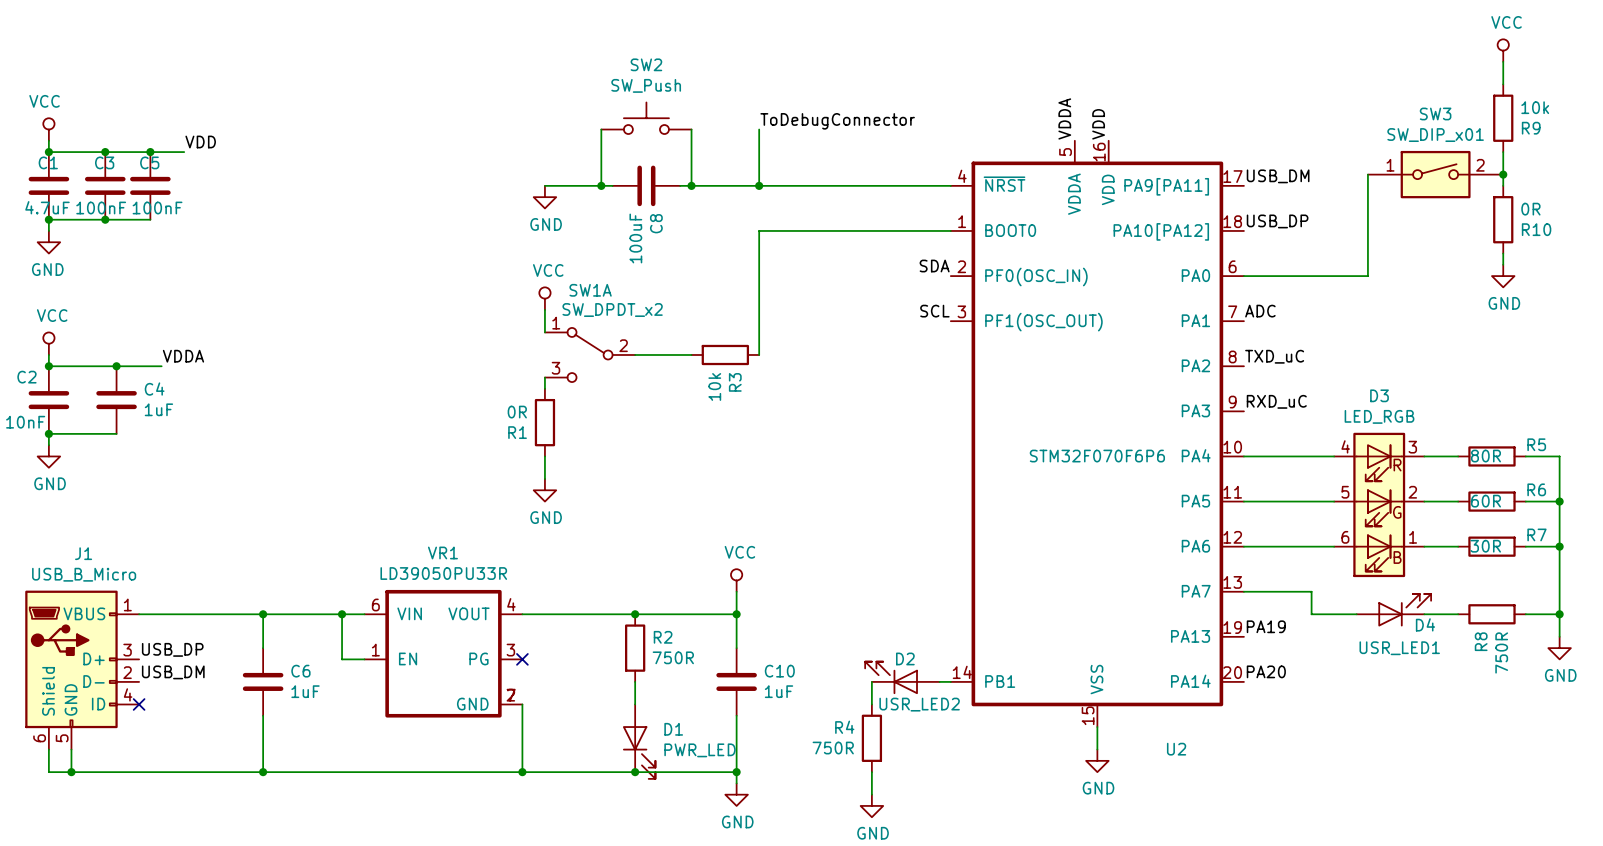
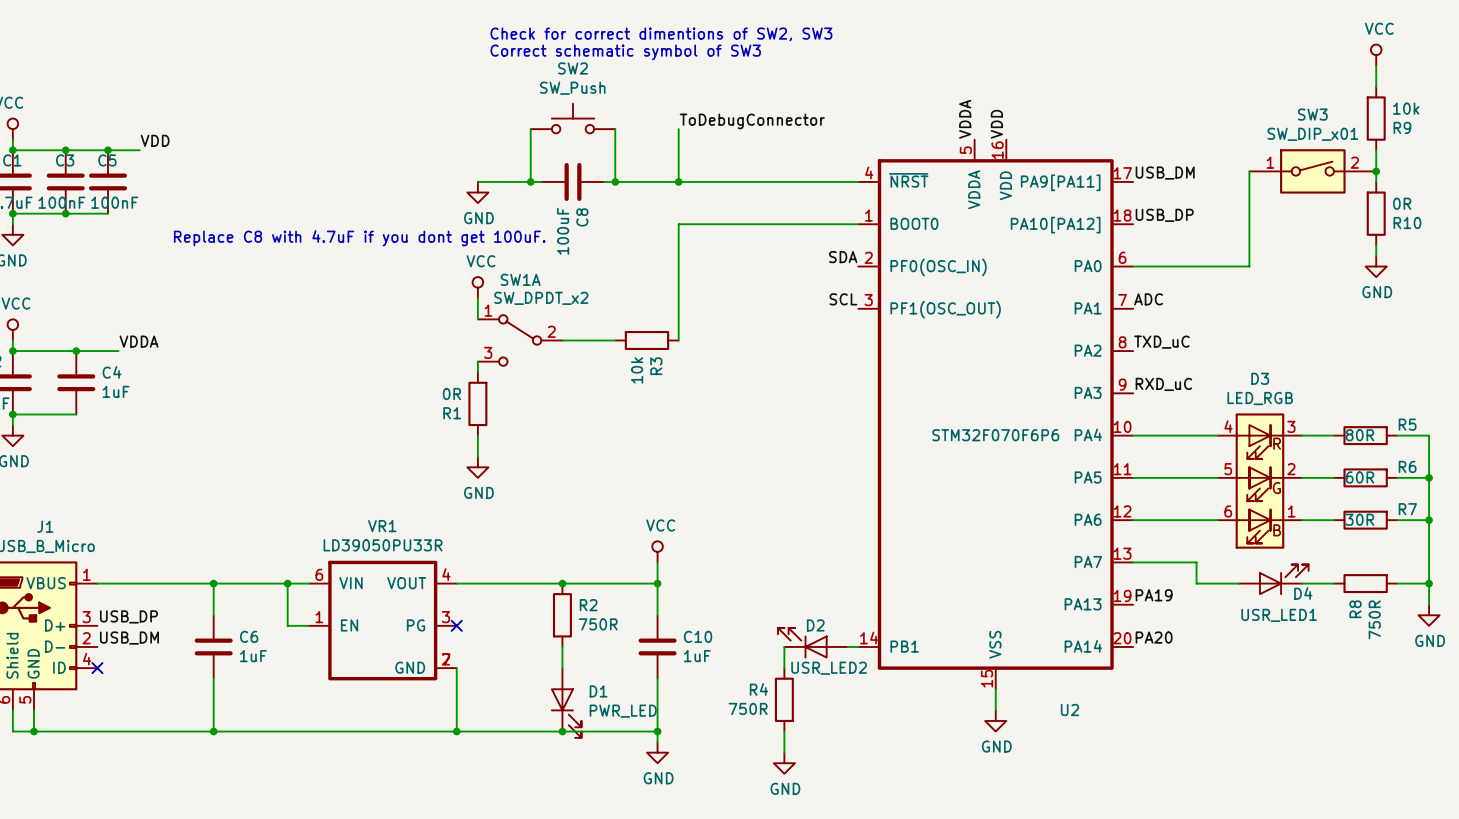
text: none -> Check for correct dimentions of SW2, SW3 (661, 34)
text: none -> Correct schematic symbol of SW3 (625, 52)
text: none -> Replace C8 with 4.7uF if you dont get 100uF. (359, 238)

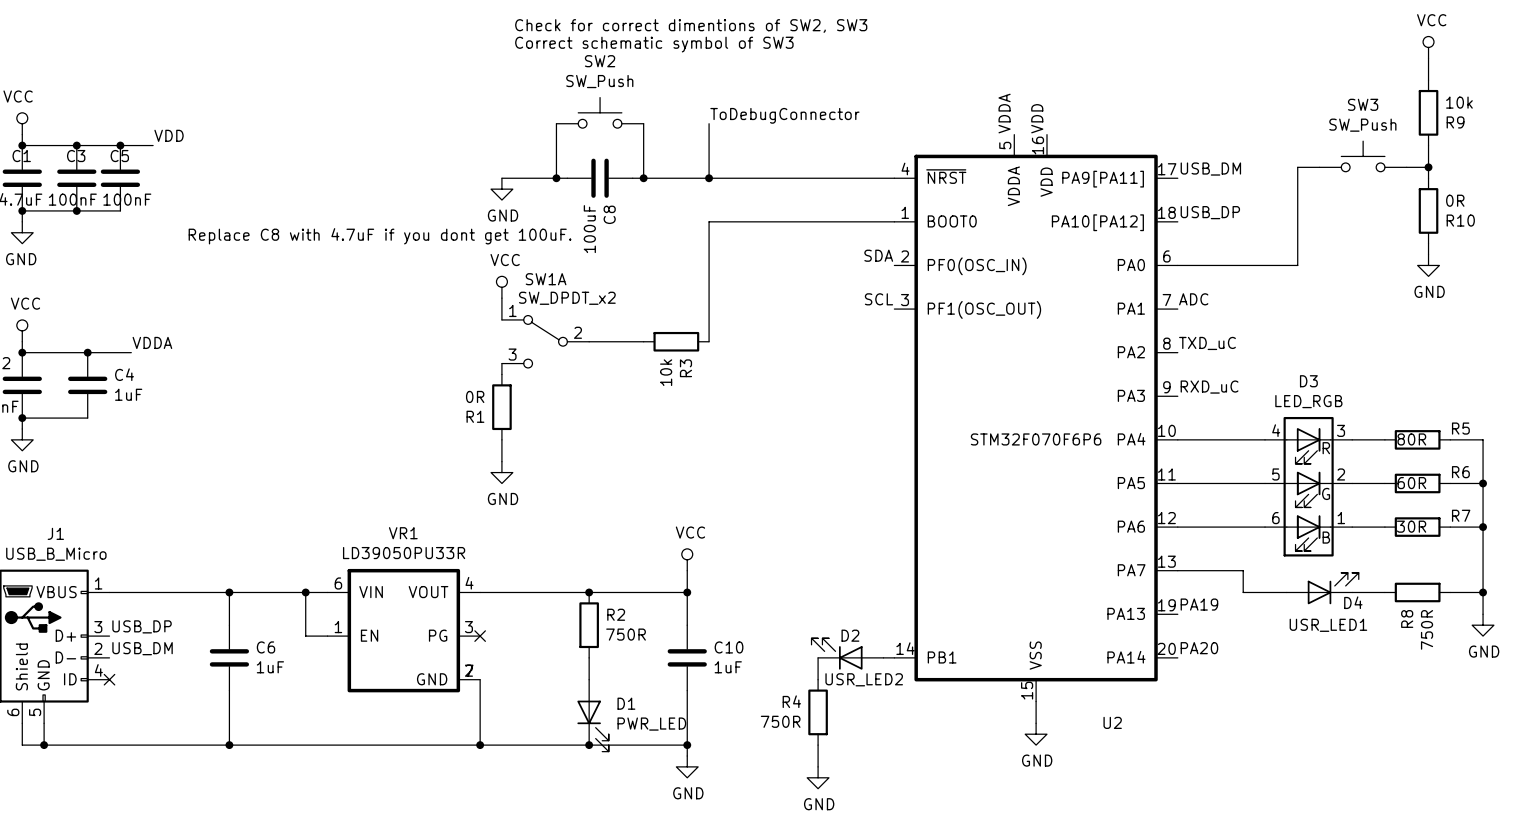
SW3 value: SW_DIP_x01 (1312, 134) -> SW_Push (1362, 125)
SW3 symbol: [1249, 149, 1377, 194] -> [1319, 141, 1407, 172]

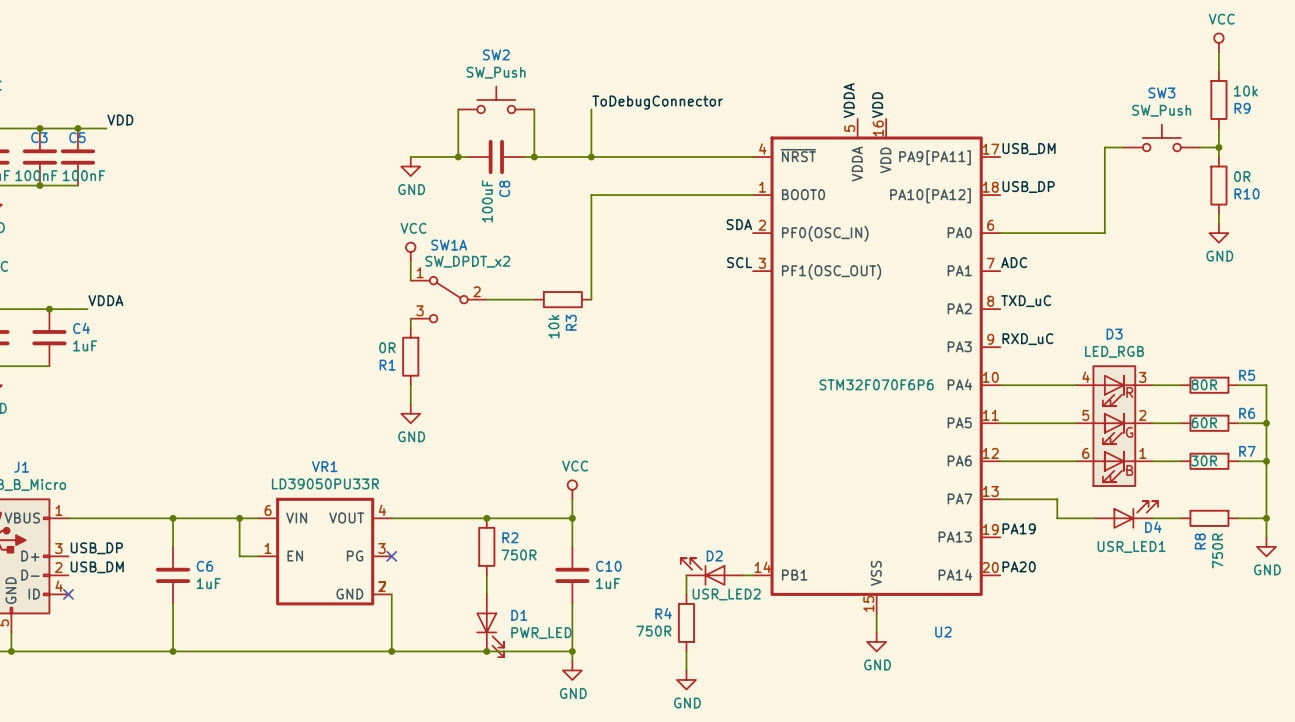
text: Check for correct dimentions of SW2, SW3 (691, 25) -> none
text: Correct schematic symbol of SW3 (654, 44) -> none
text: Replace C8 with 4.7uF if you dont get 100uF. (380, 236) -> none

